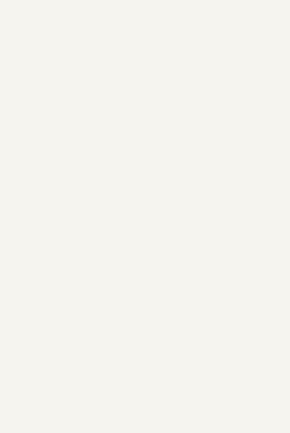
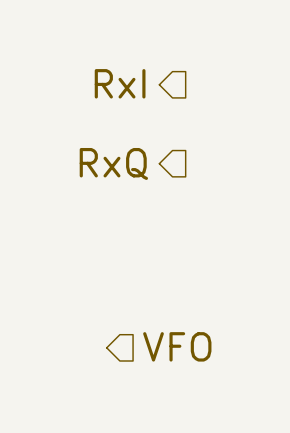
hierarchical label: none -> RxI (120, 83)
hierarchical label: none -> RxQ (113, 163)
hierarchical label: none -> VFO (177, 346)

